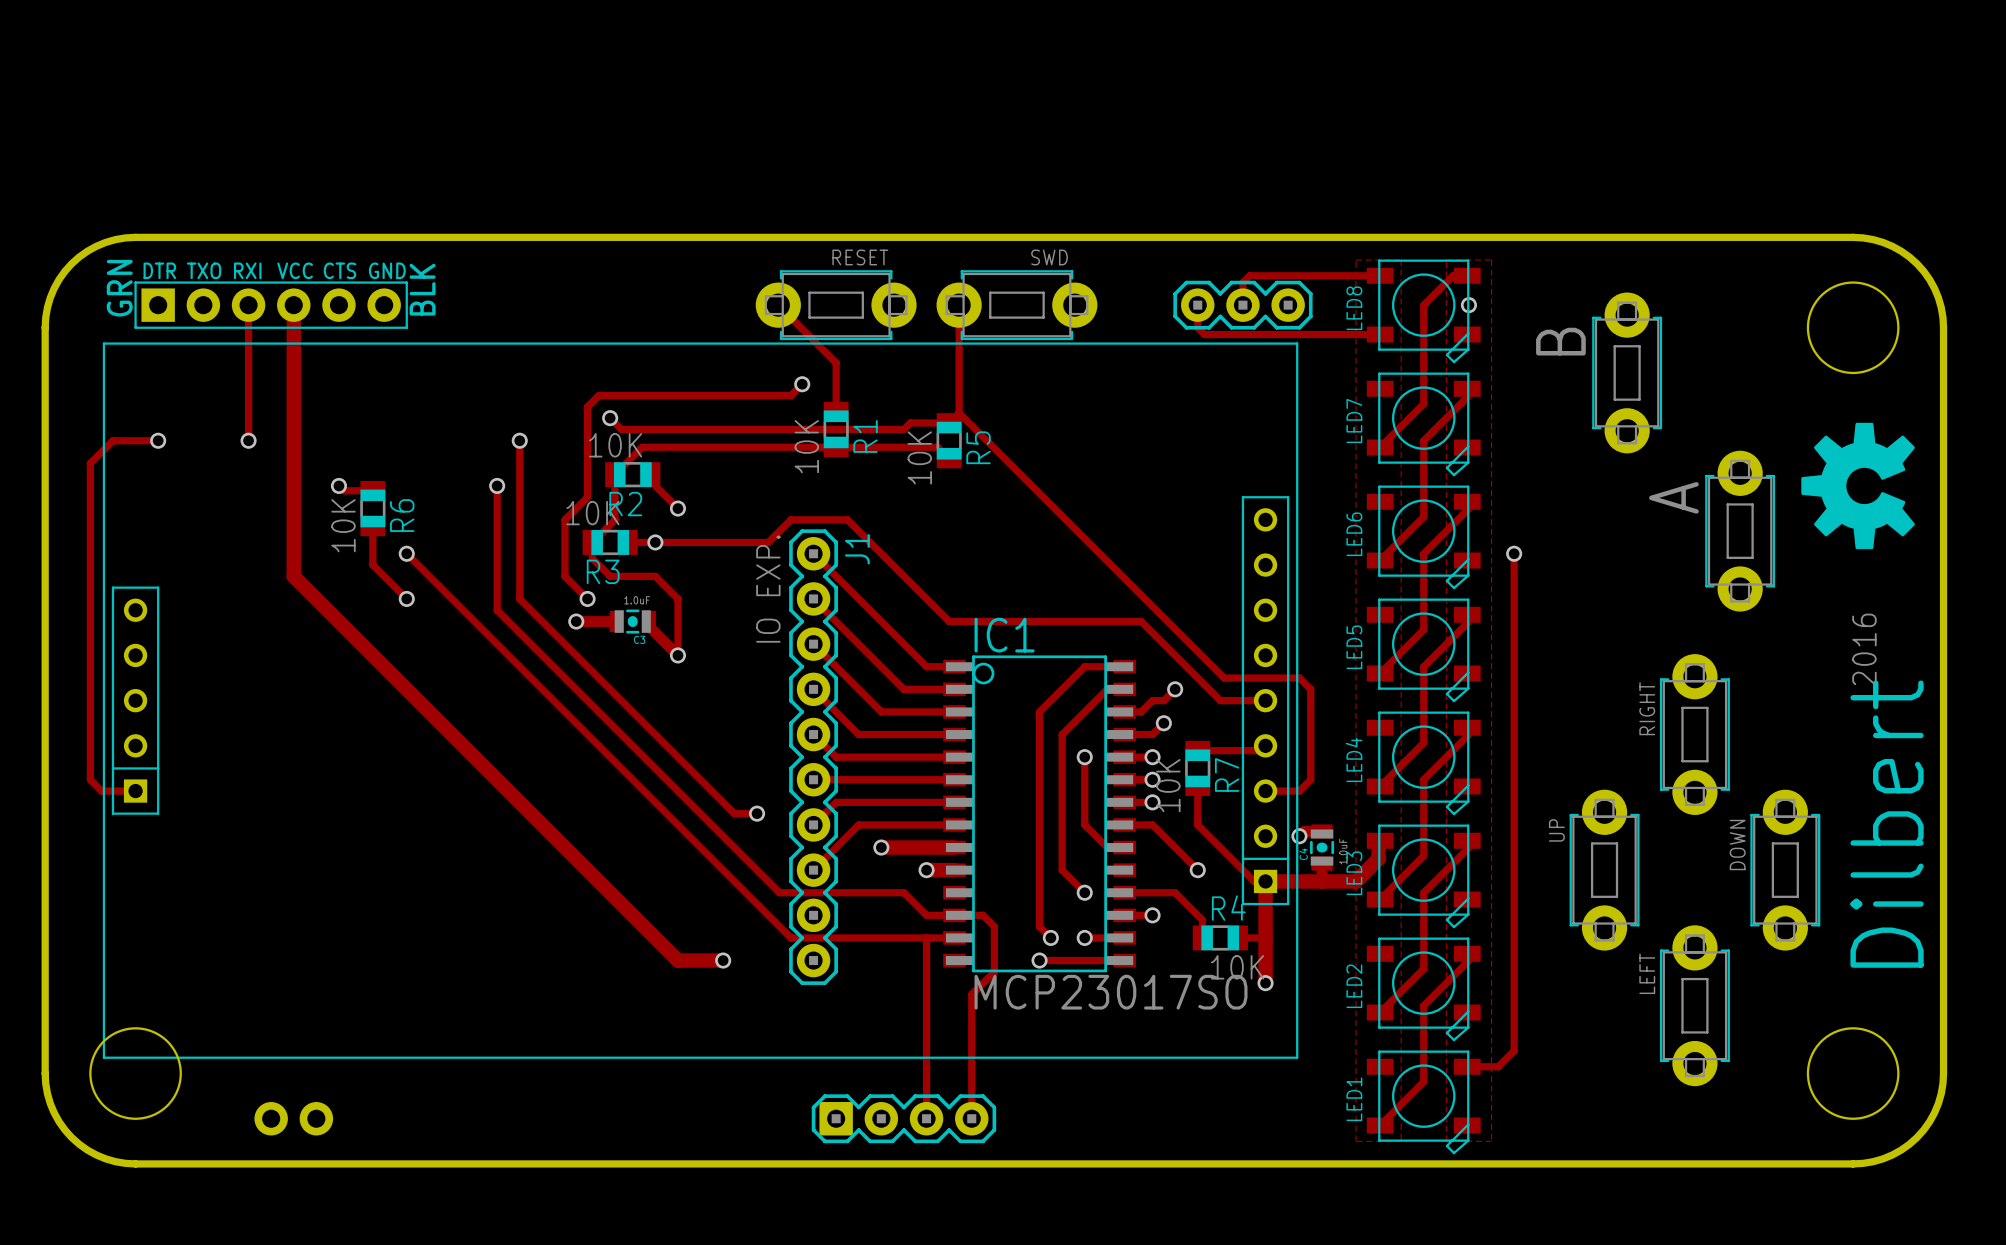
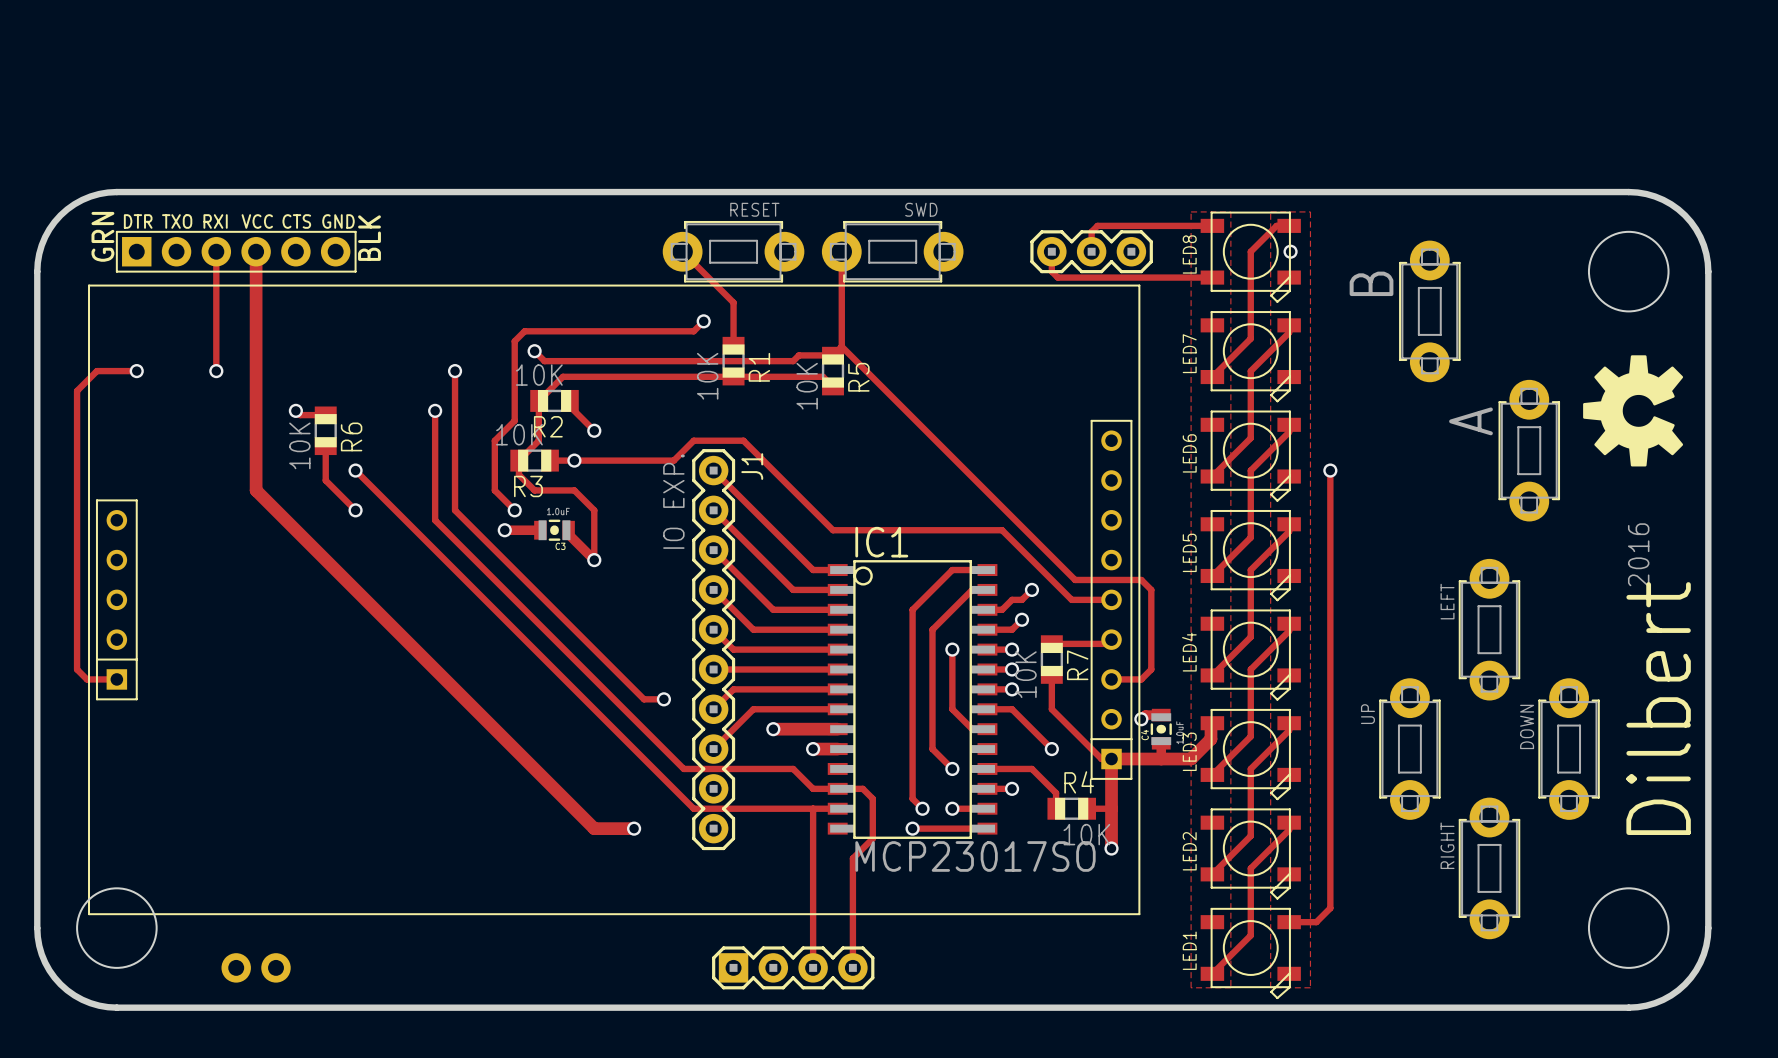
part value: RIGHT (1647, 708) -> LEFT (1447, 601)
part value: LEFT (1647, 973) -> RIGHT (1447, 845)

